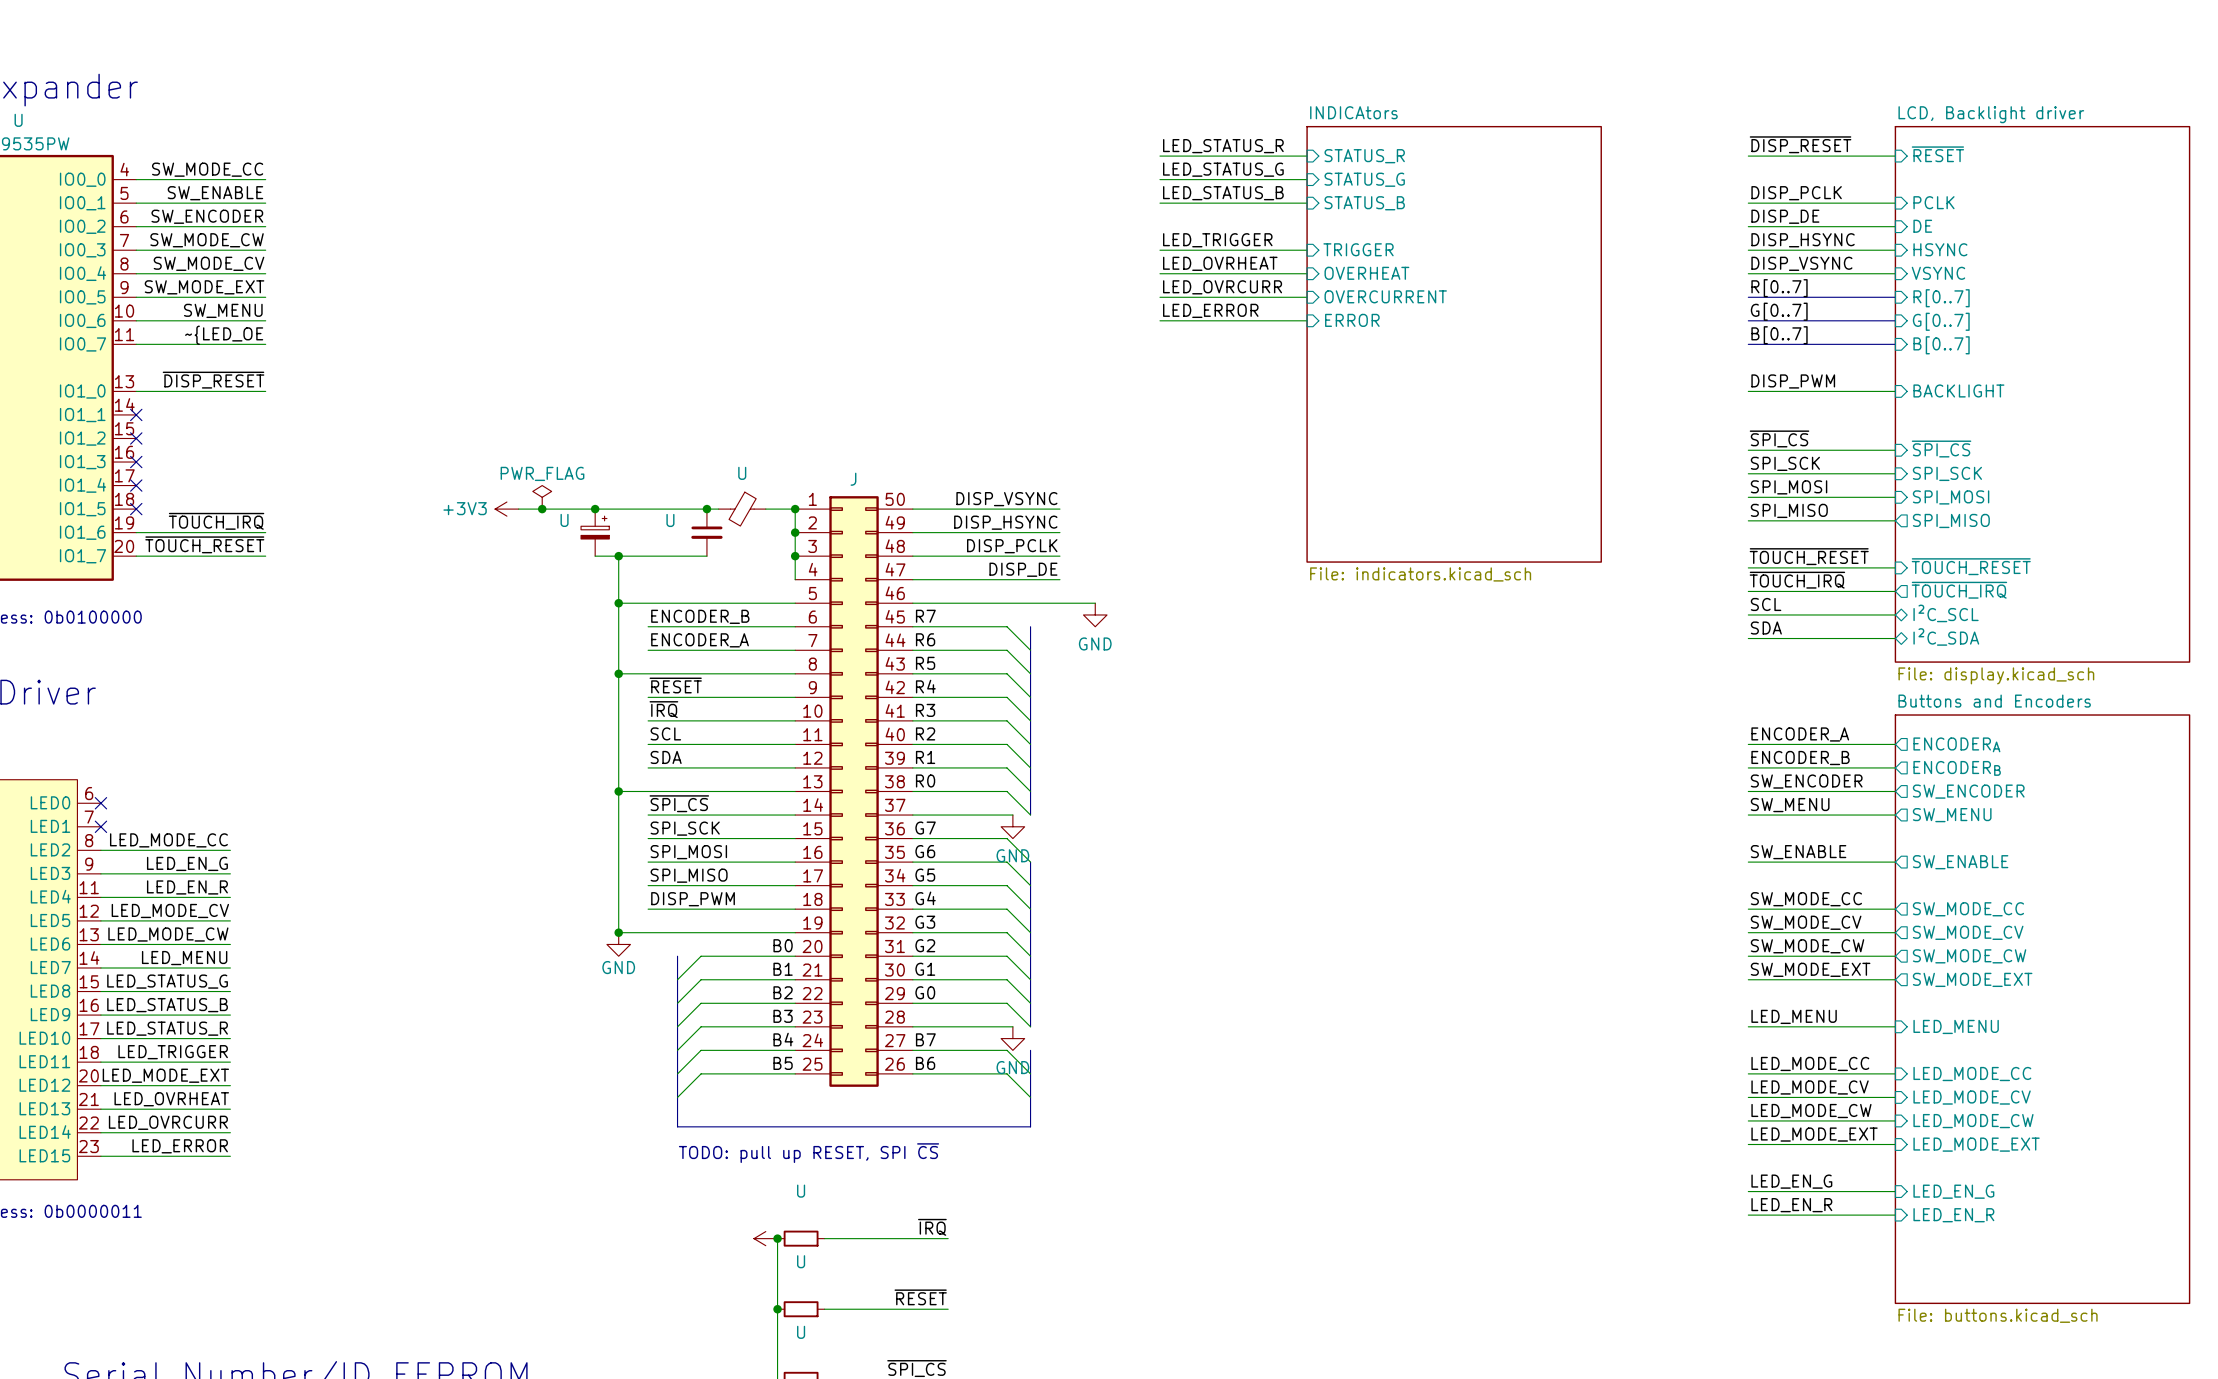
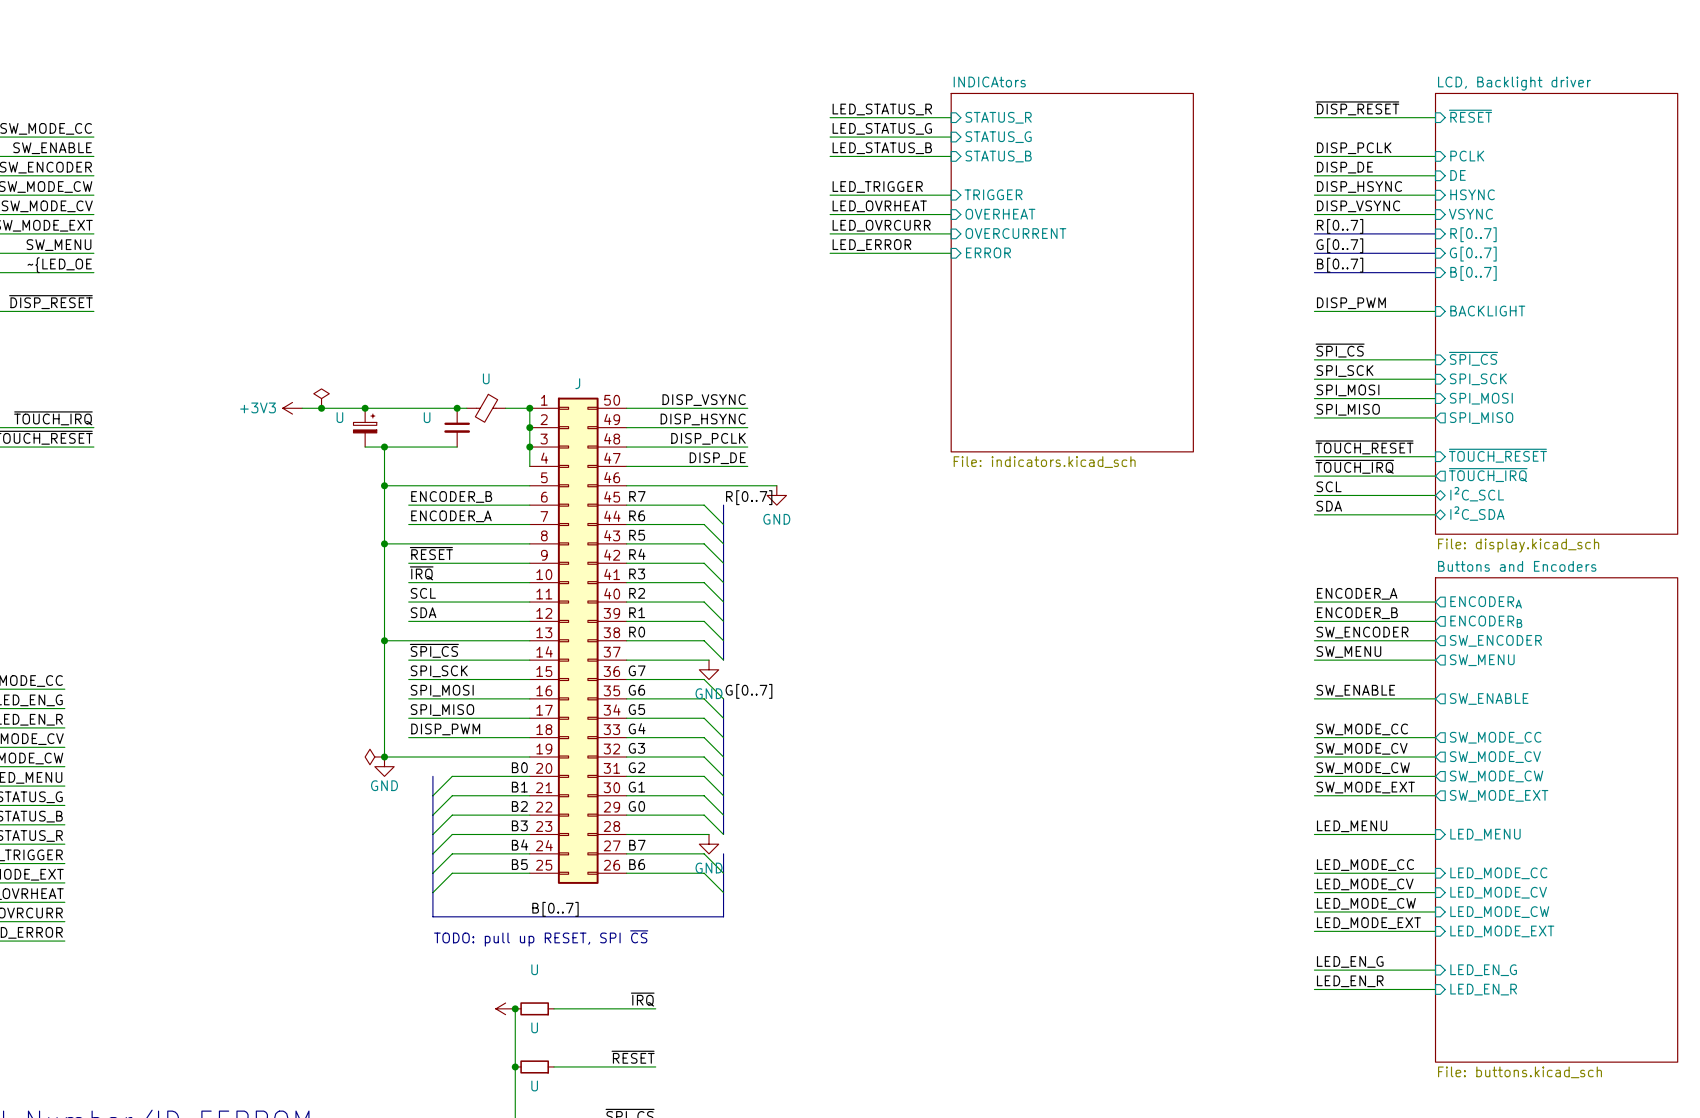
power symbol text: PWR_FLAG (542, 473) -> none
label: none -> R[0..7] (749, 497)
label: none -> G[0..7] (748, 691)
power symbol: none -> (374, 757)
label: none -> B[0..7] (555, 909)

